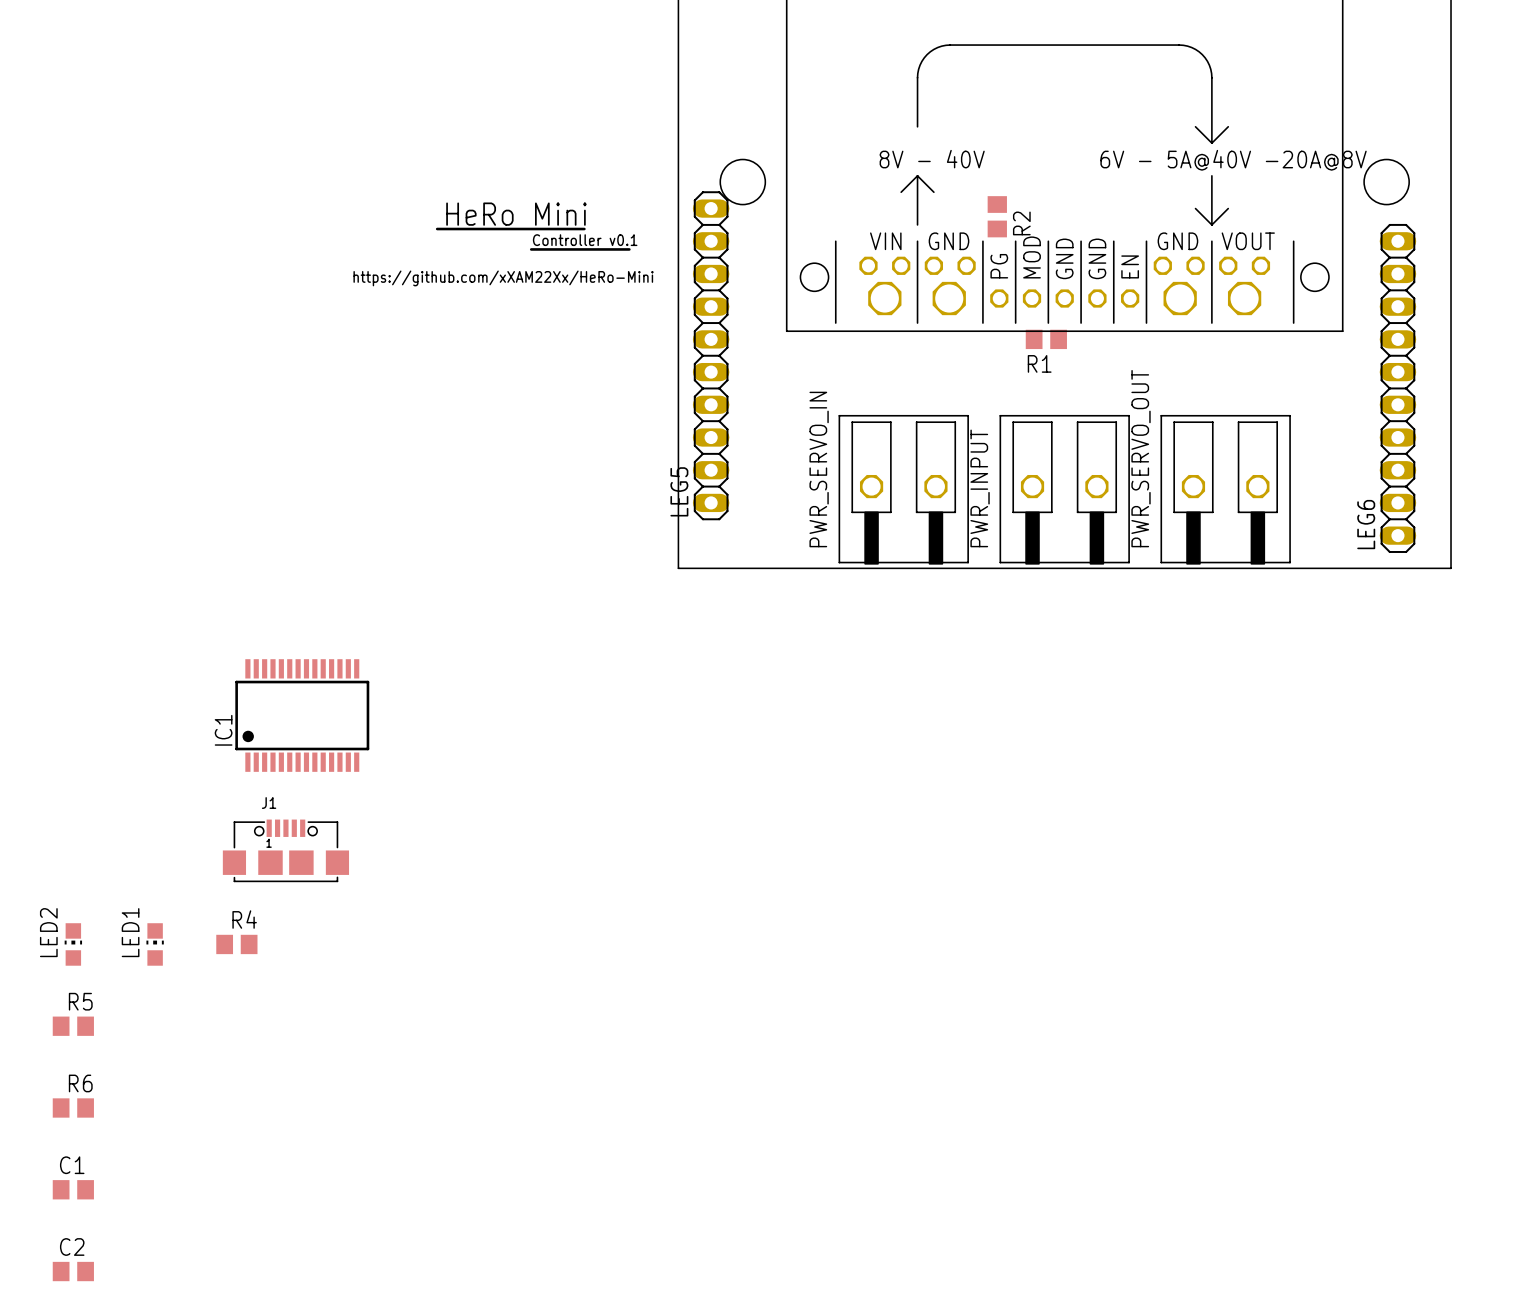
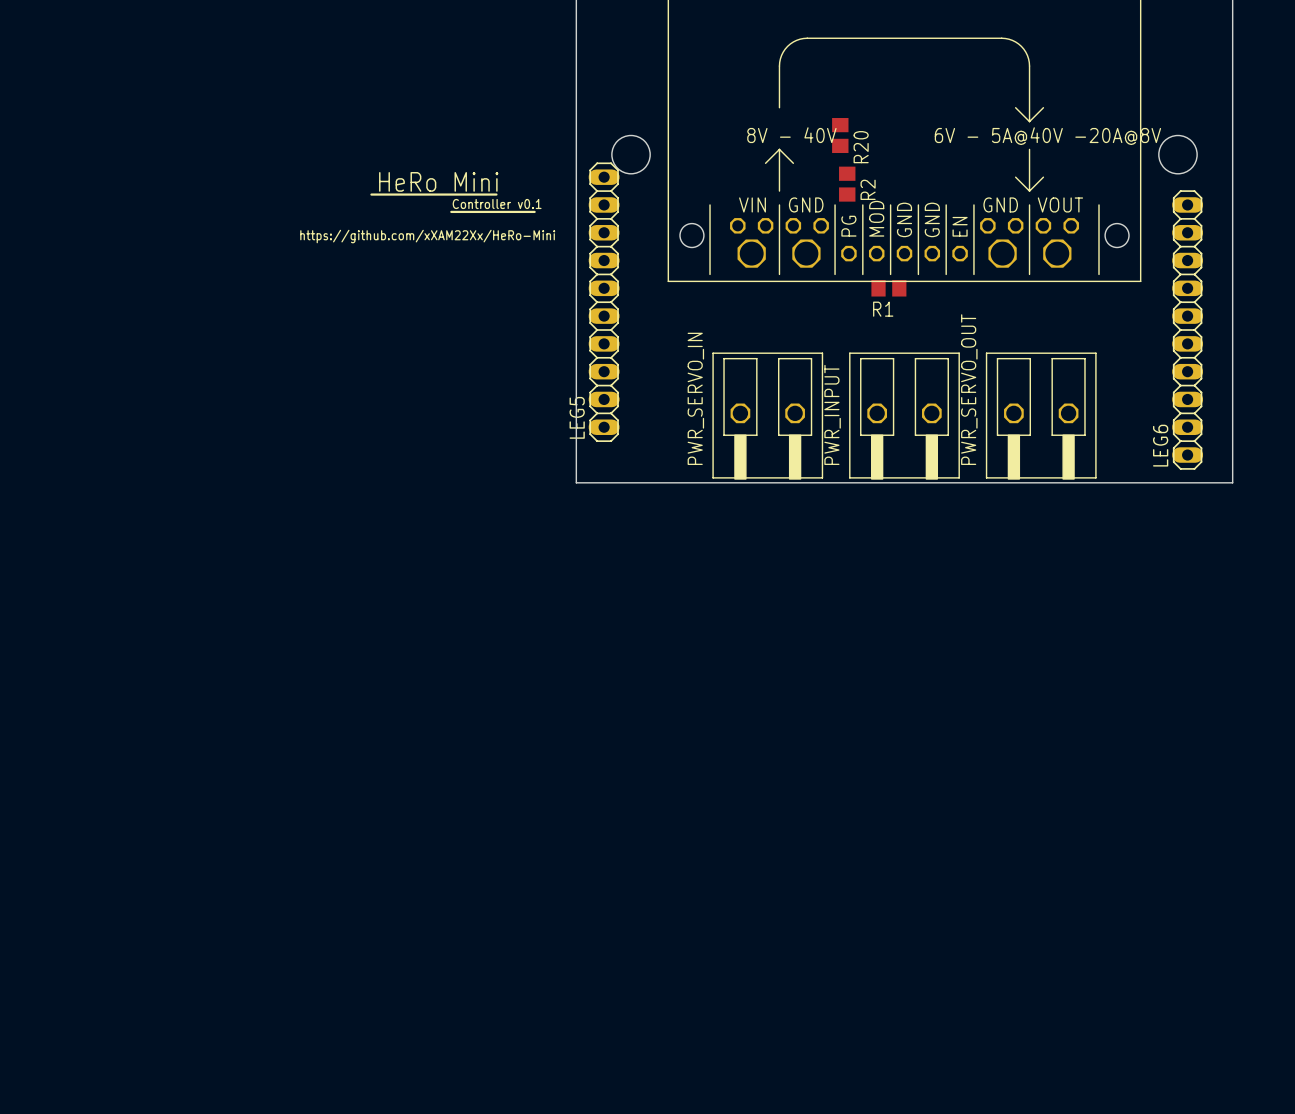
R20: none -> (840, 135)
IC1: (302, 715) -> none
J1: (285, 850) -> none
LED2: (73, 944) -> none
LED1: (155, 944) -> none
R4: (236, 944) -> none
R5: (73, 1026) -> none
R6: (73, 1107) -> none
C1: (73, 1189) -> none
C2: (73, 1271) -> none

